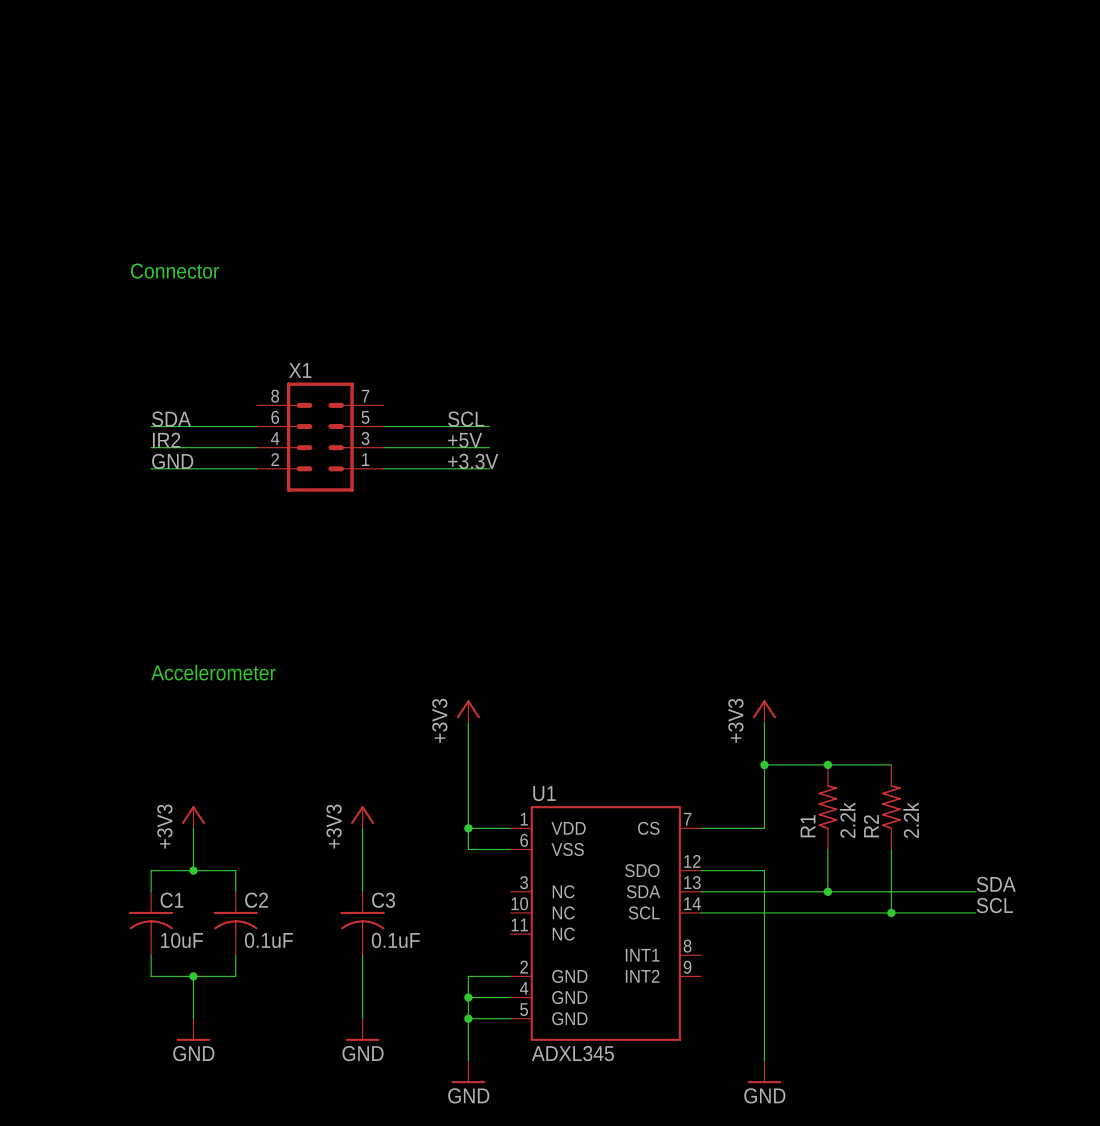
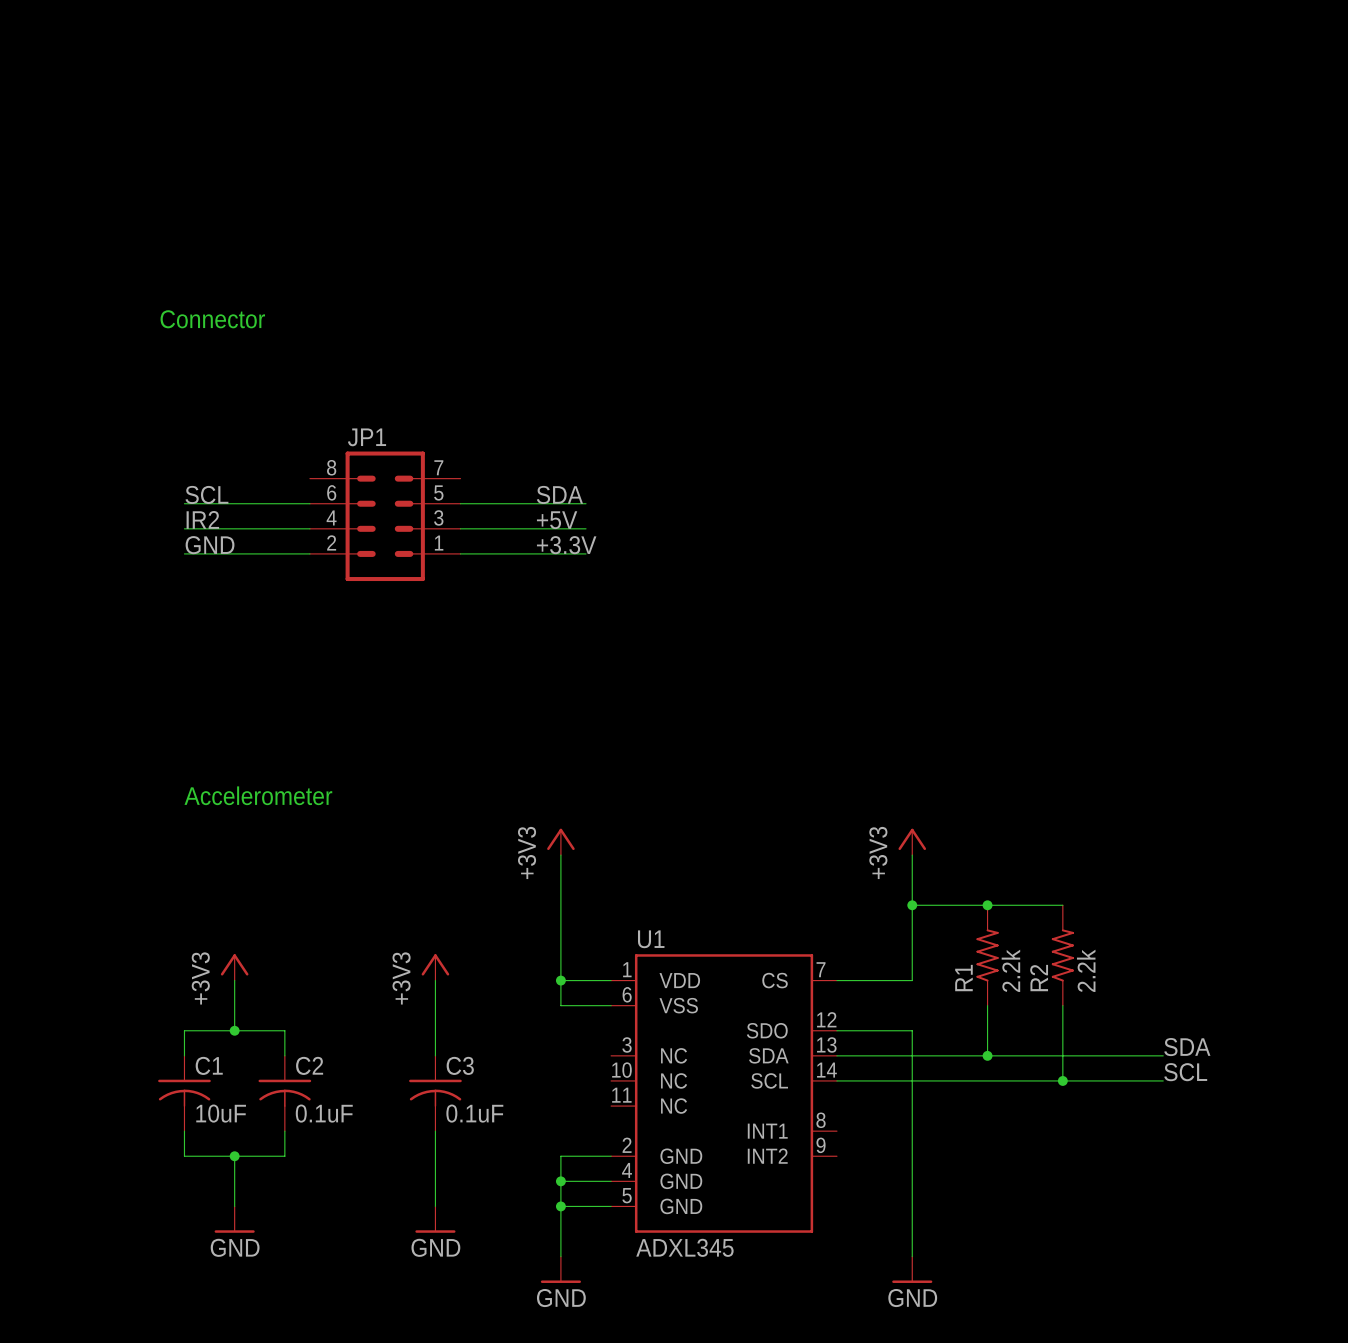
X1 name: X1 (300, 370) -> JP1 (367, 437)
label: SDA (171, 419) -> SCL (206, 494)
label: SCL (466, 419) -> SDA (559, 494)

